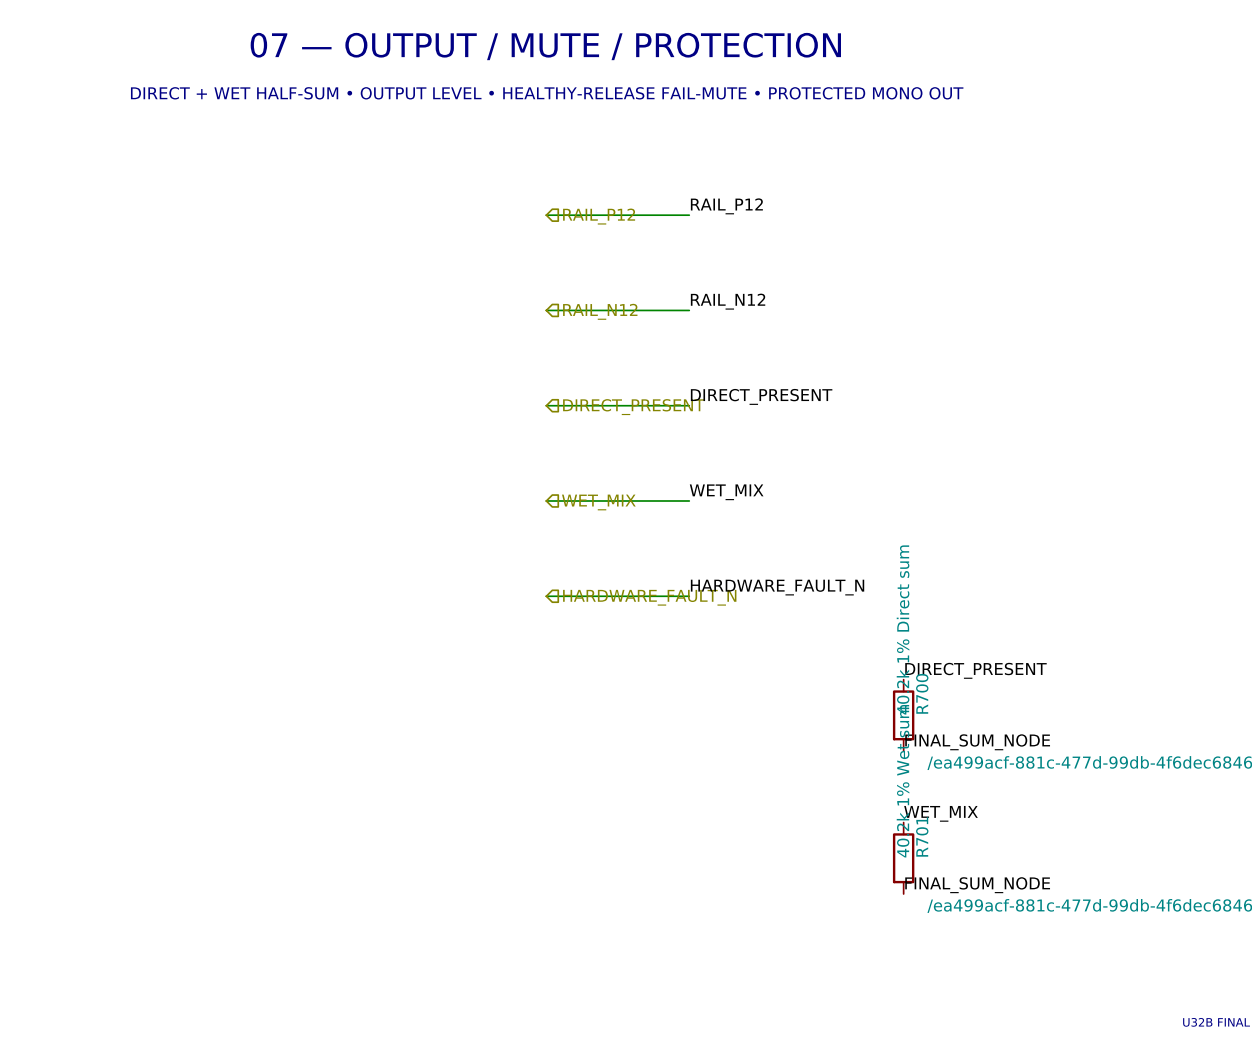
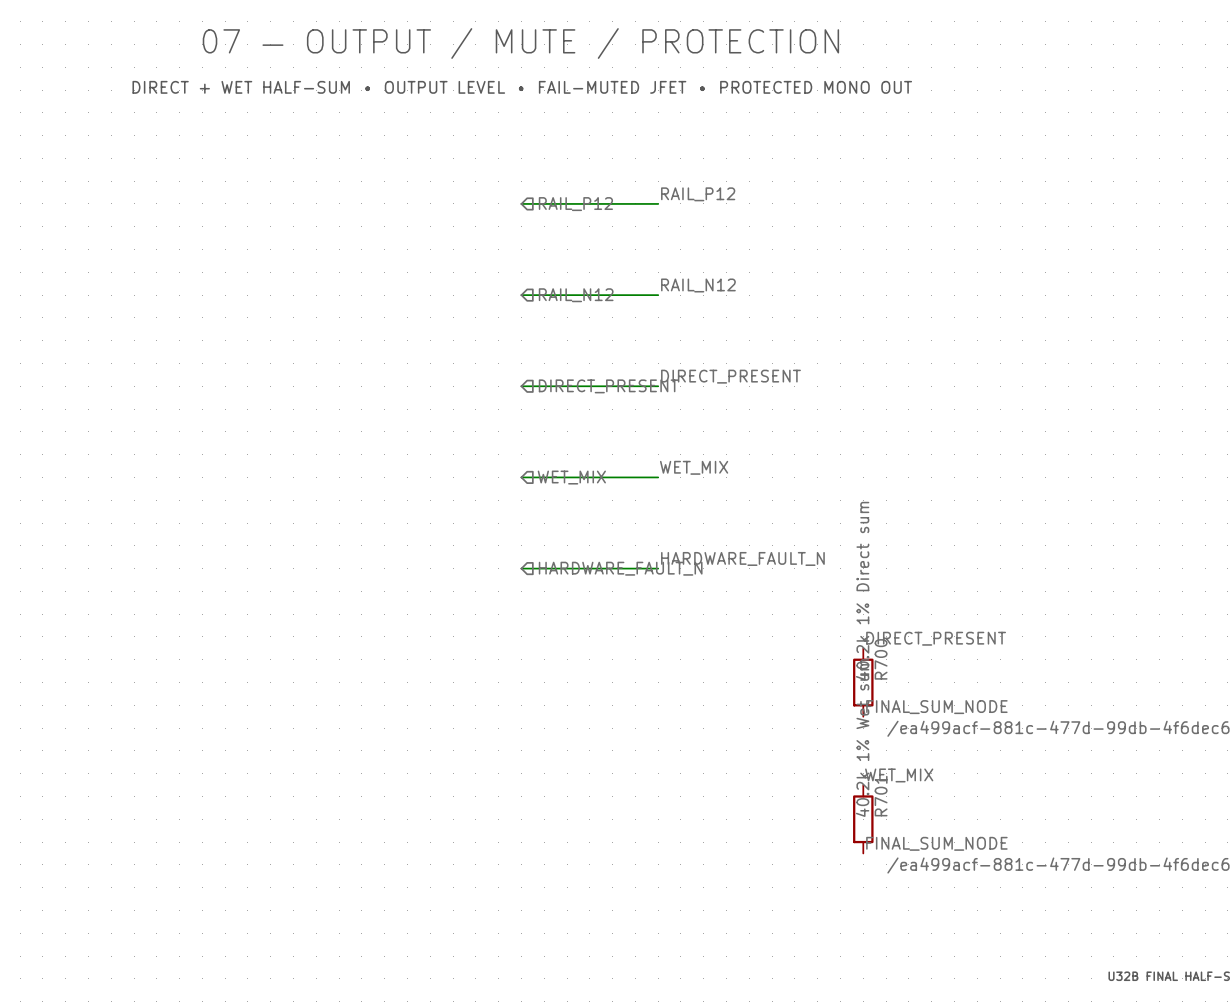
text: DIRECT + WET HALF-SUM • OUTPUT LEVEL • HEALTHY-RELEASE FAIL-MUTE • PROTECTED MONO OUT (547, 93) -> DIRECT + WET HALF-SUM • OUTPUT LEVEL • FAIL-MUTED JFET • PROTECTED MONO OUT (522, 87)

